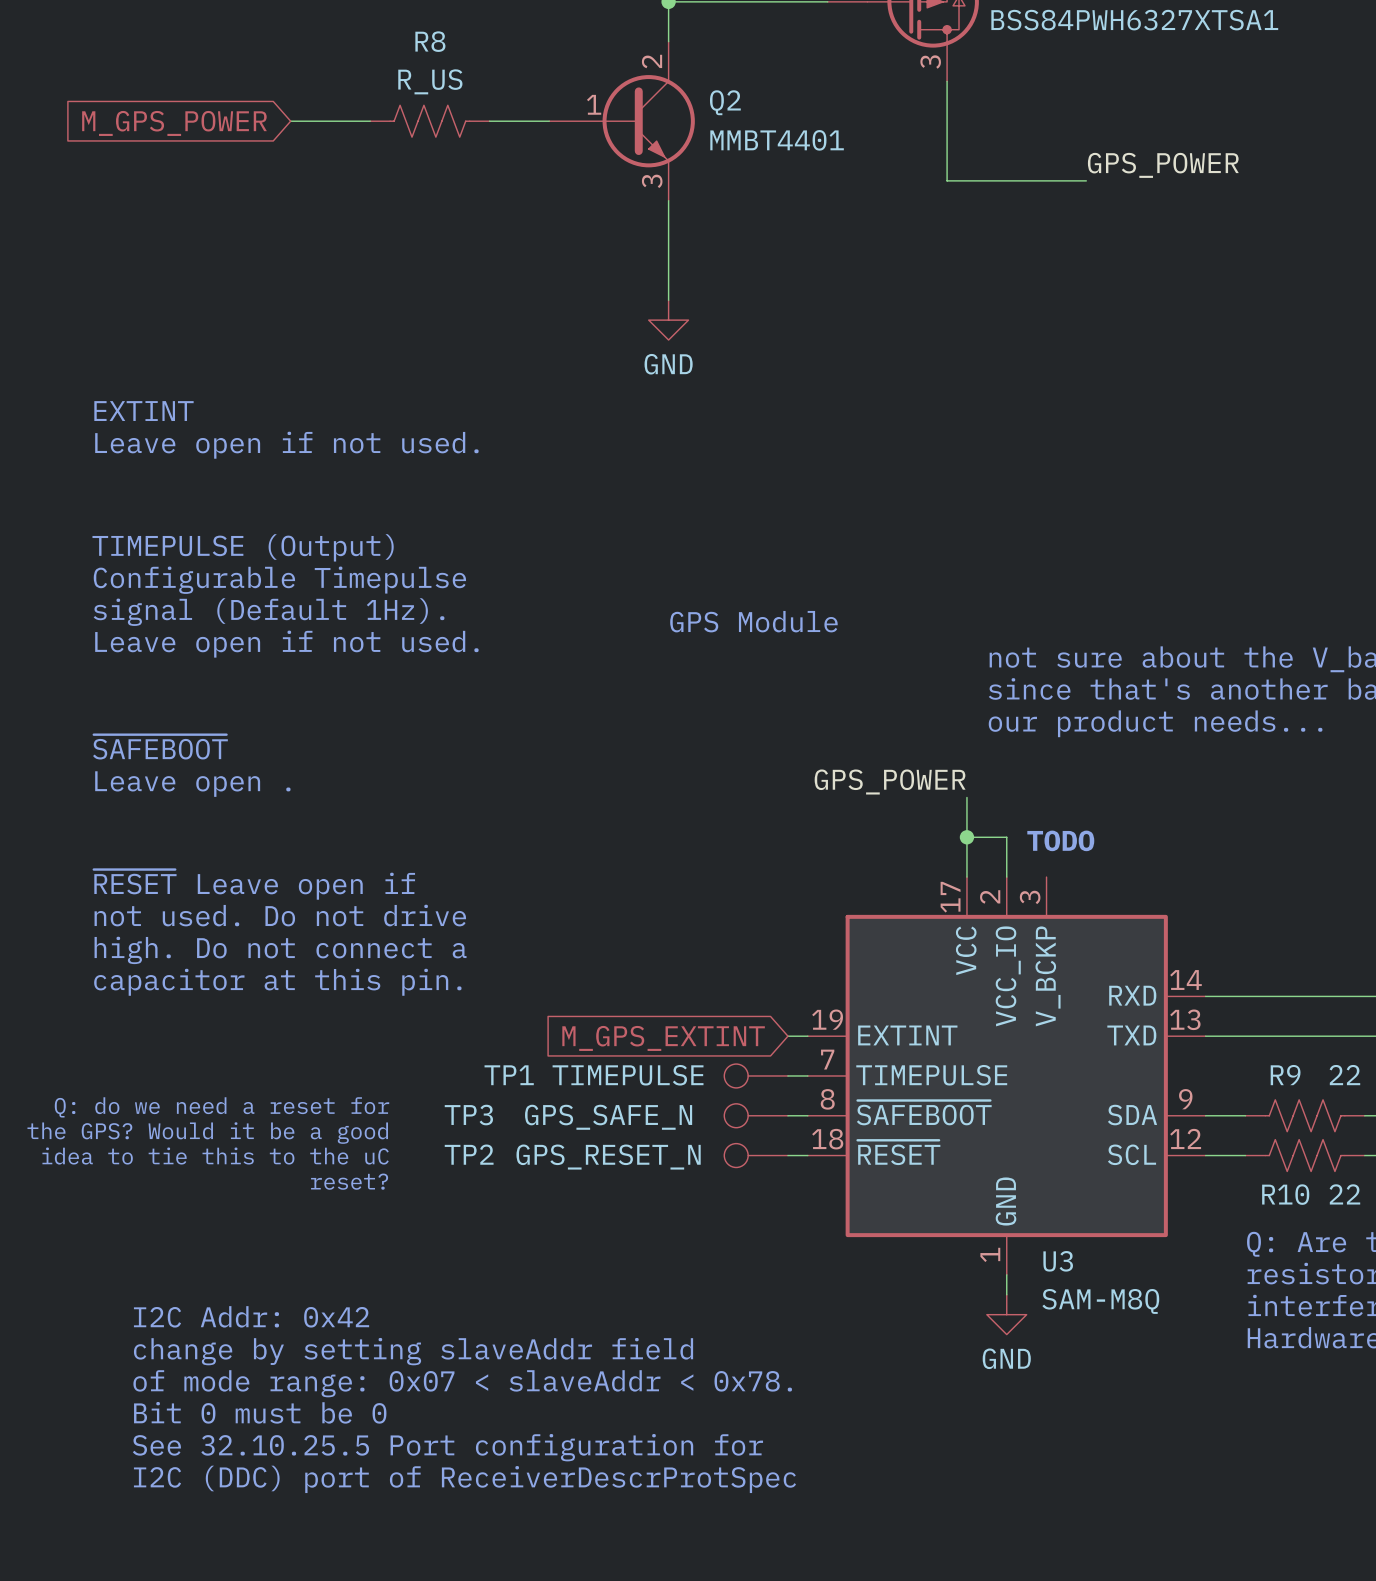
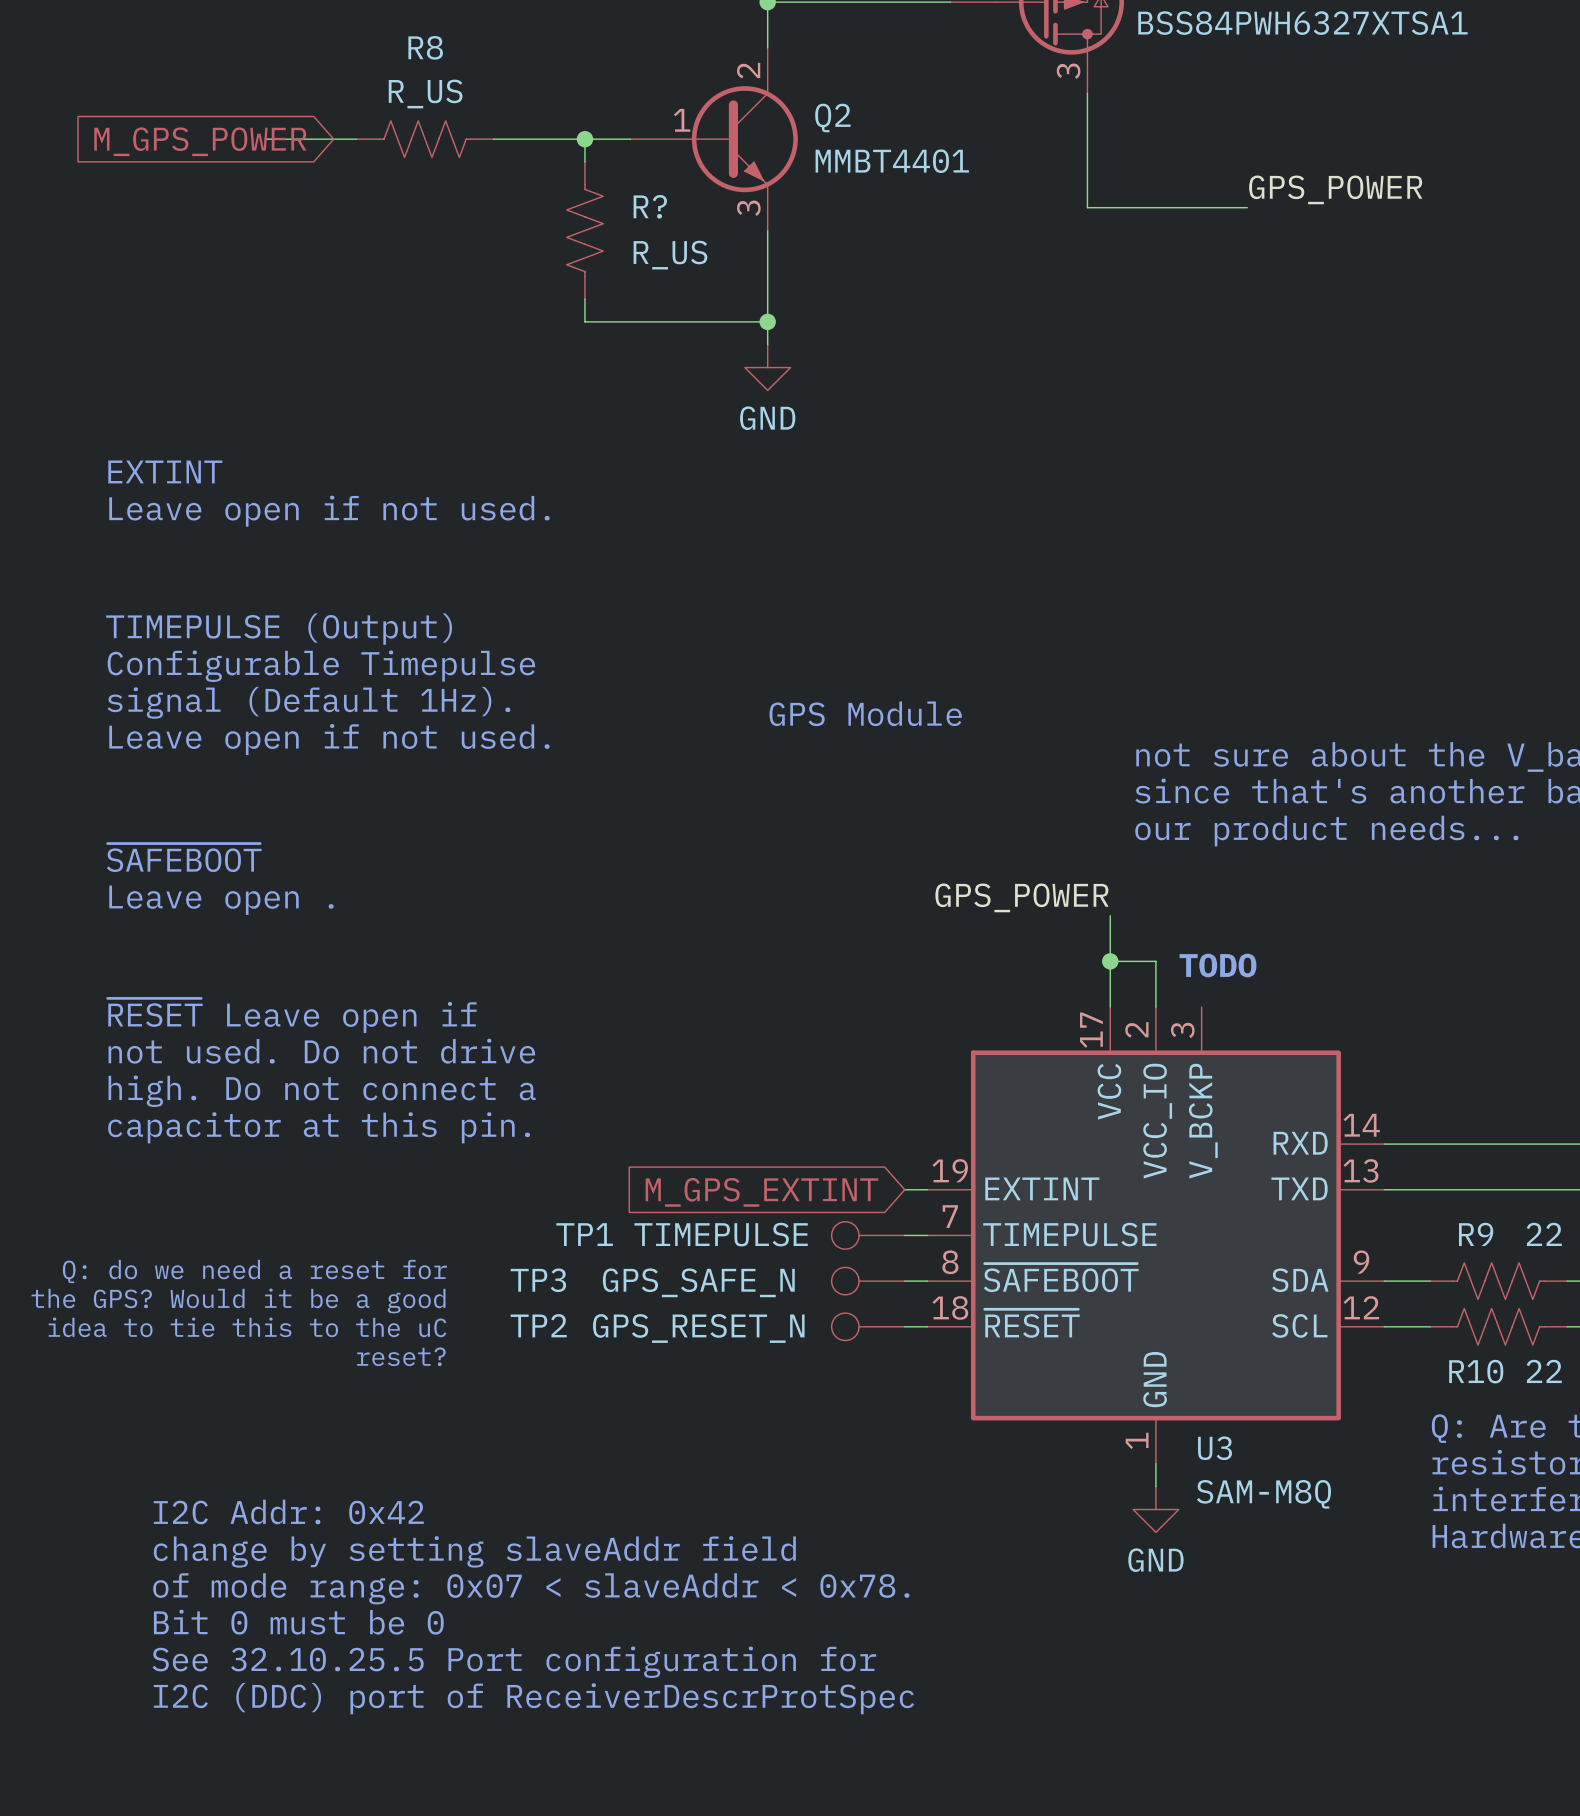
wire: (310, 121) (370, 121) -> (265, 139) (333, 139)
wire: none -> (493, 139) (562, 139)
R8 position: (429, 121) -> (425, 139)
wire: none -> (584, 139) (584, 162)
junction: none -> (584, 139)
R?: none -> R_US (584, 230)
wire: none -> (584, 299) (584, 321) (767, 321)
junction: none -> (767, 321)

